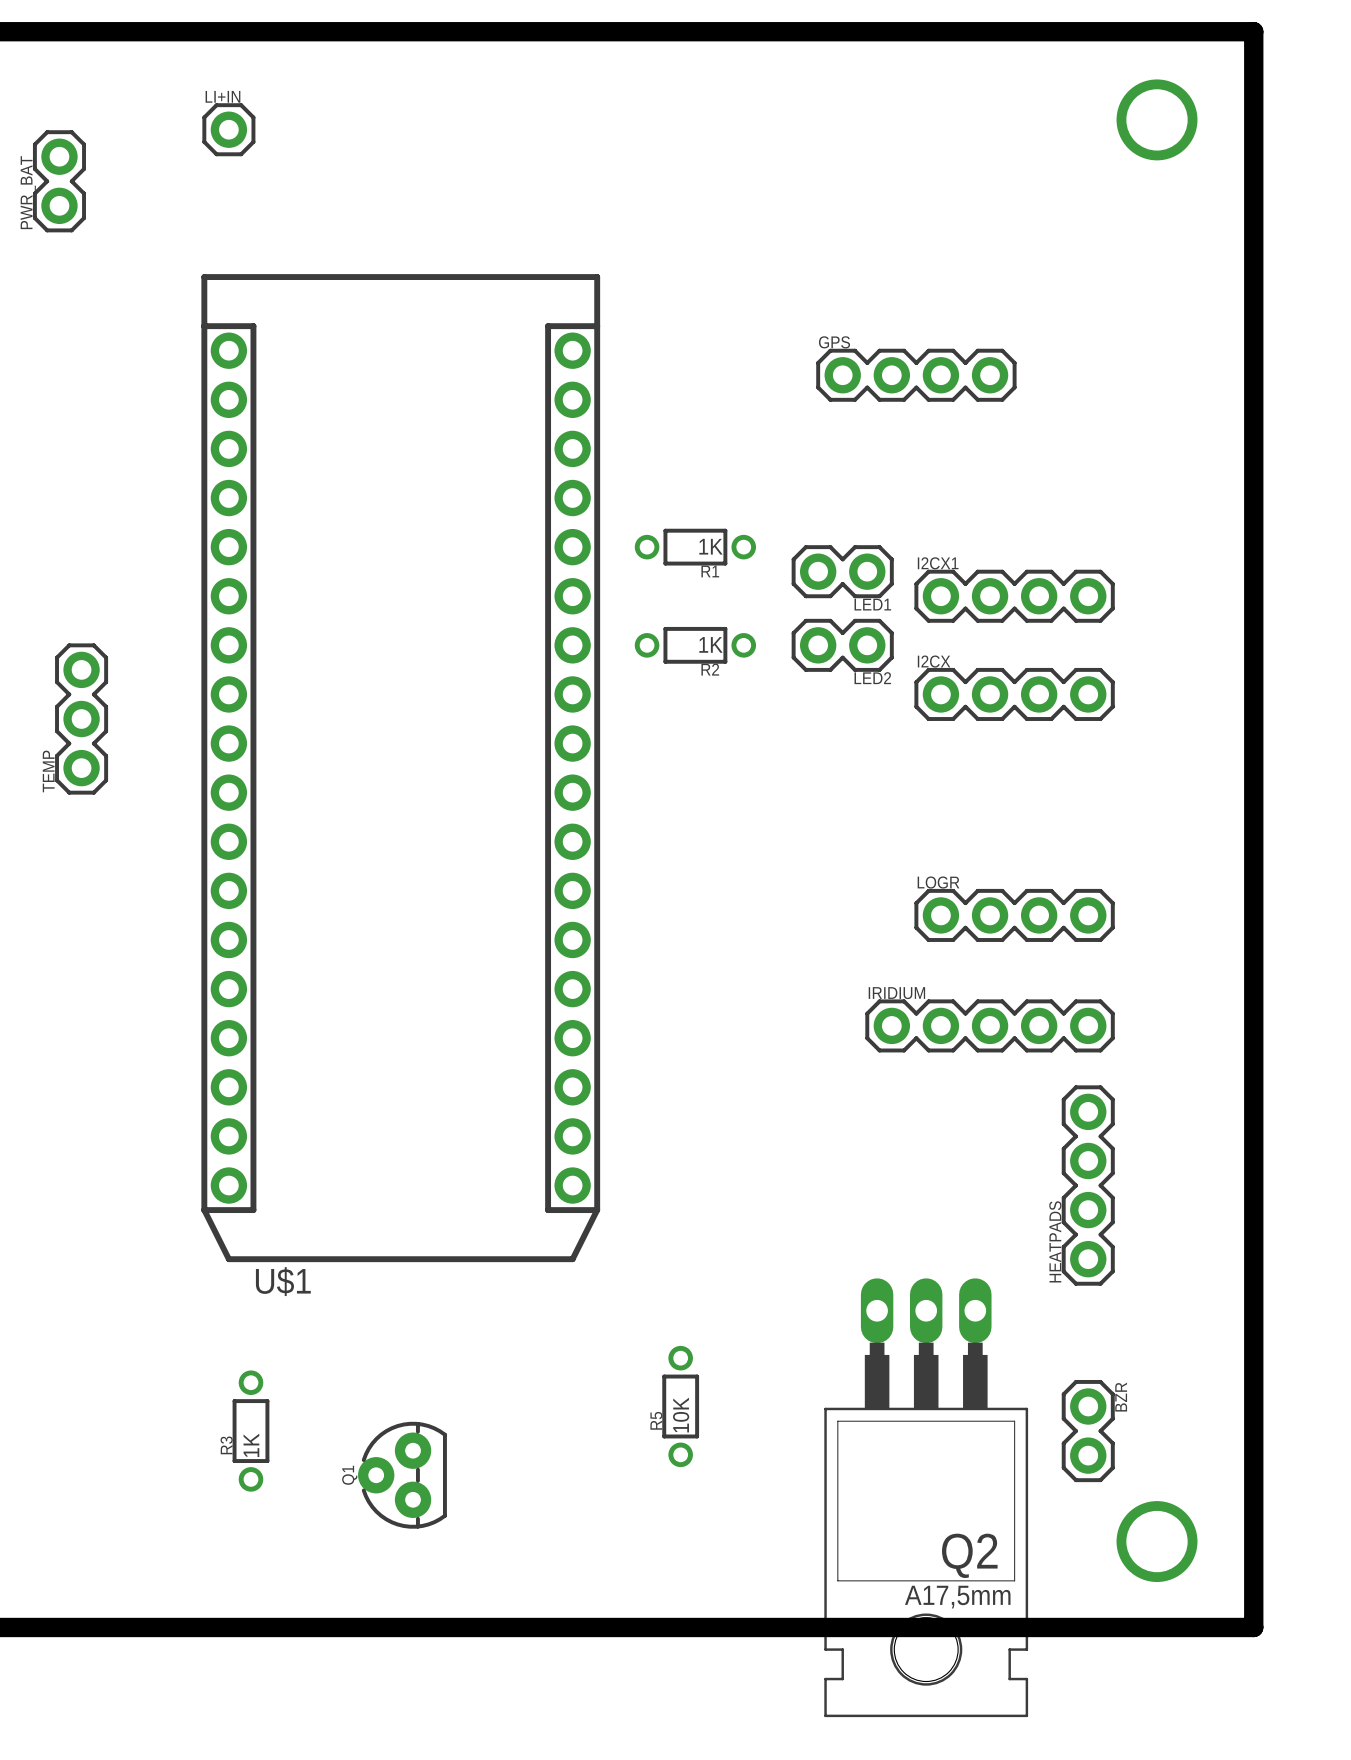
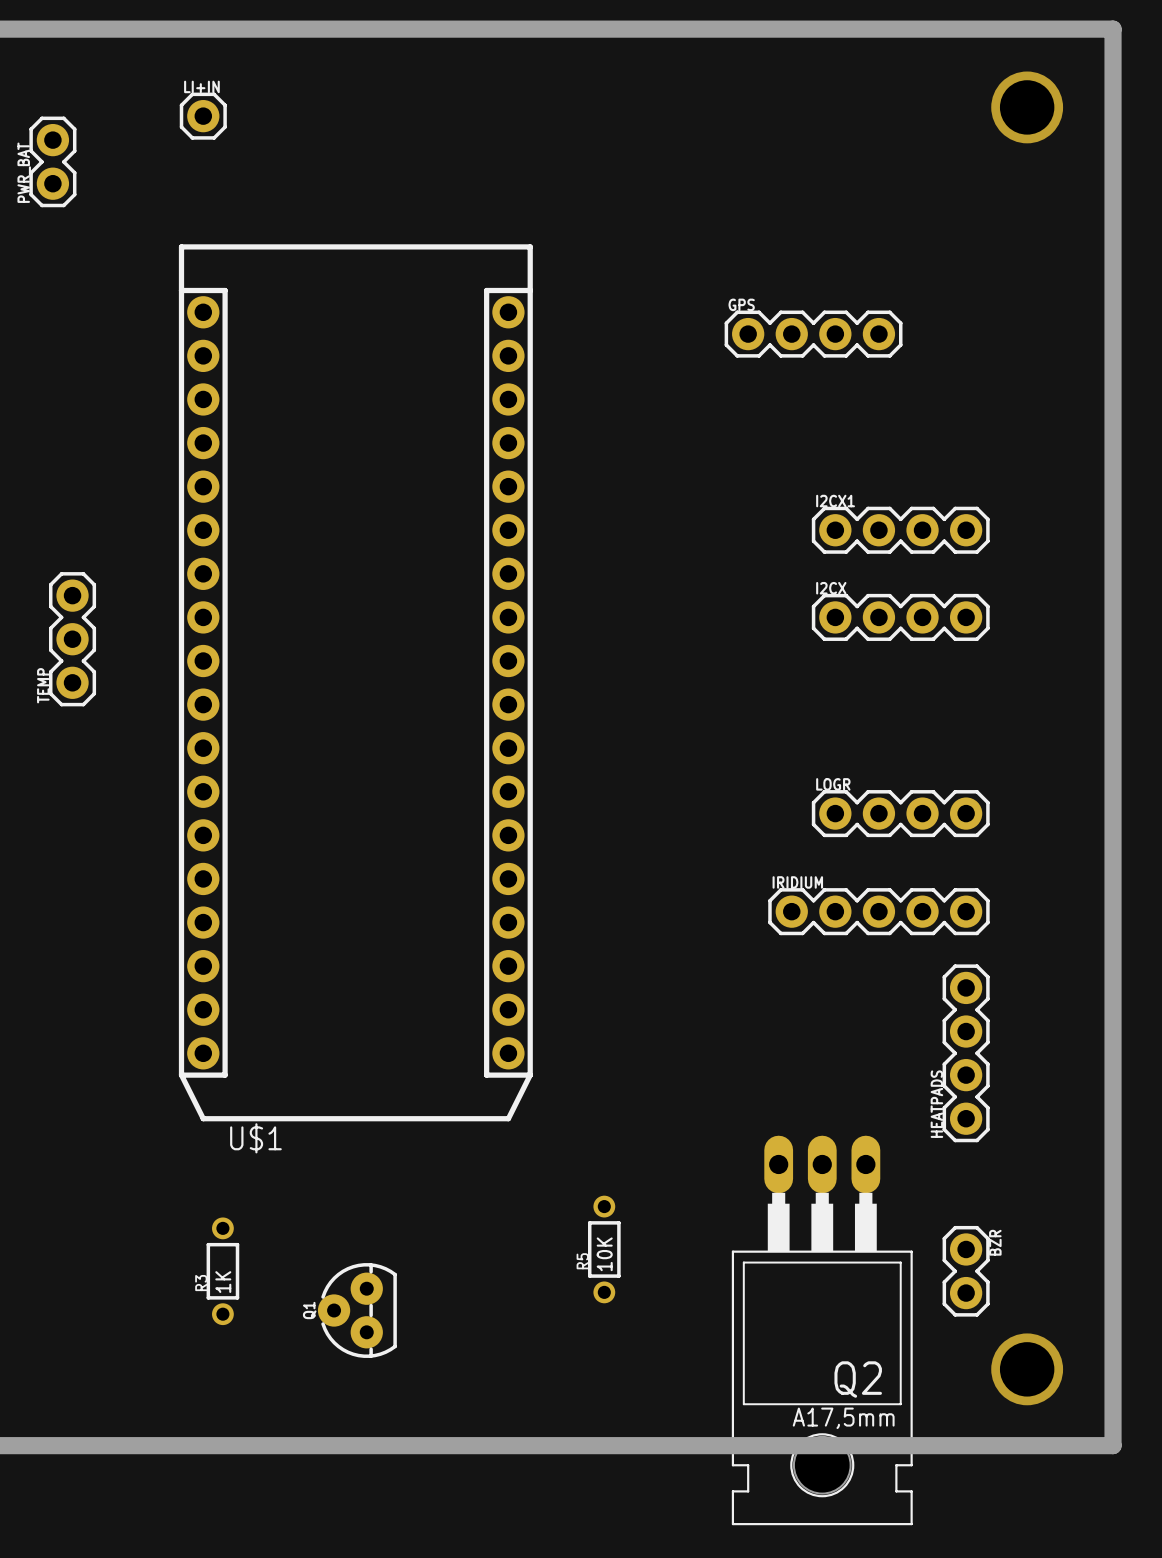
R1: 1K (695, 547) -> none
LED1: (842, 571) -> none
R2: 1K (695, 645) -> none
LED2: (842, 645) -> none

